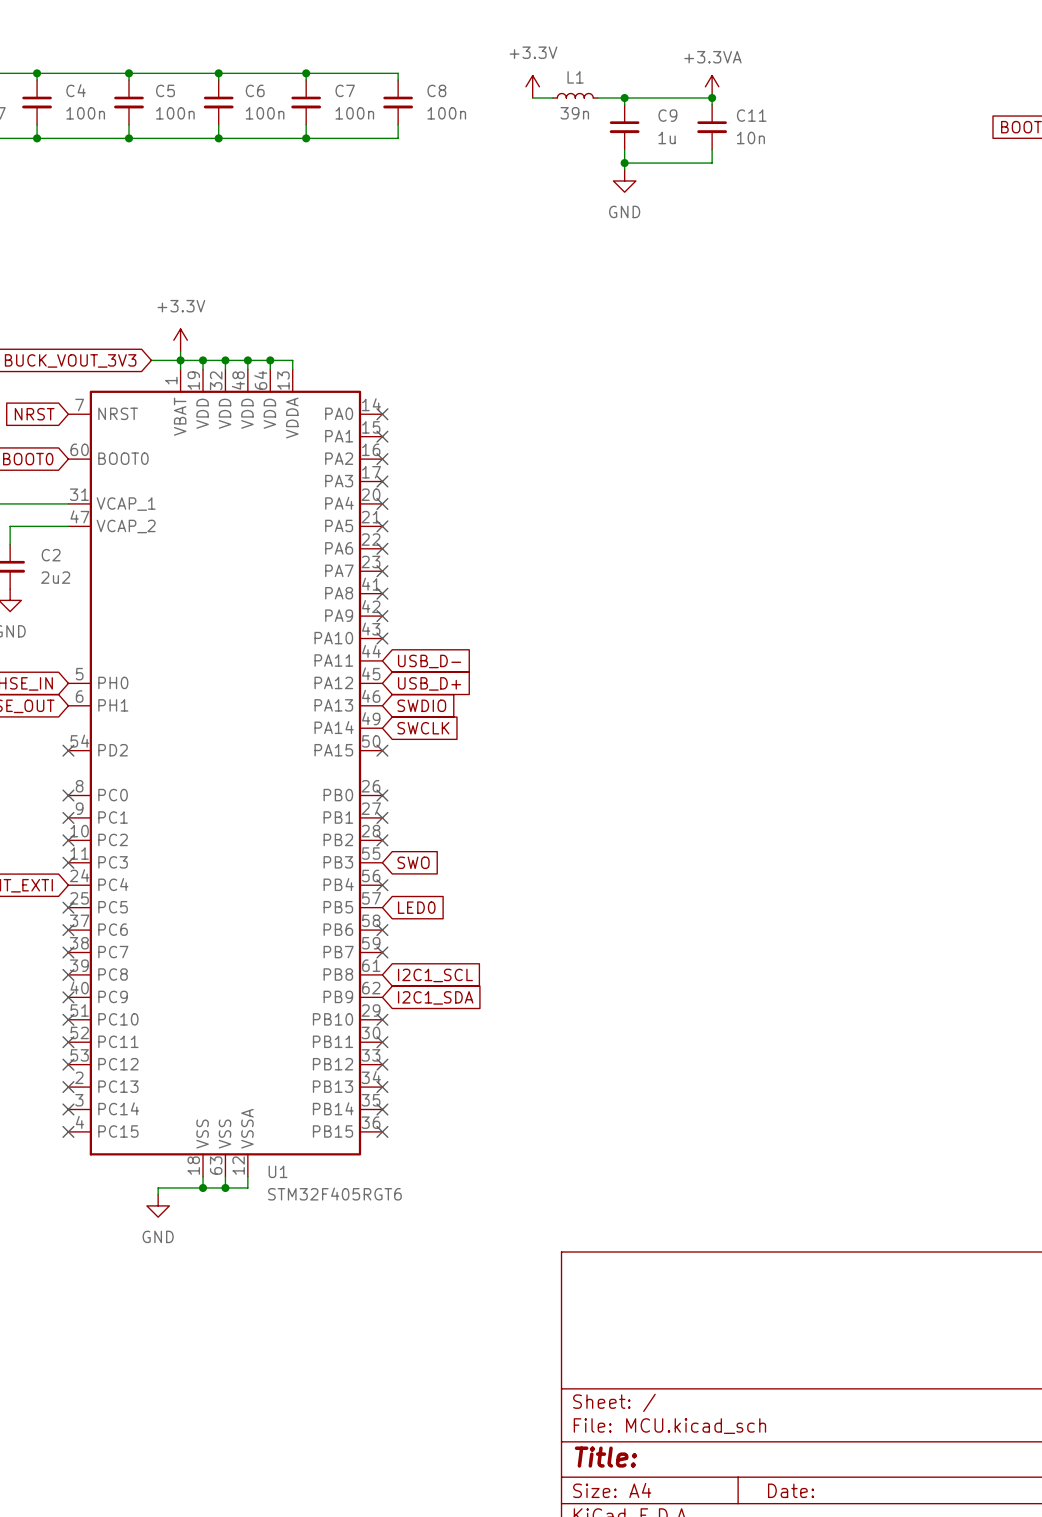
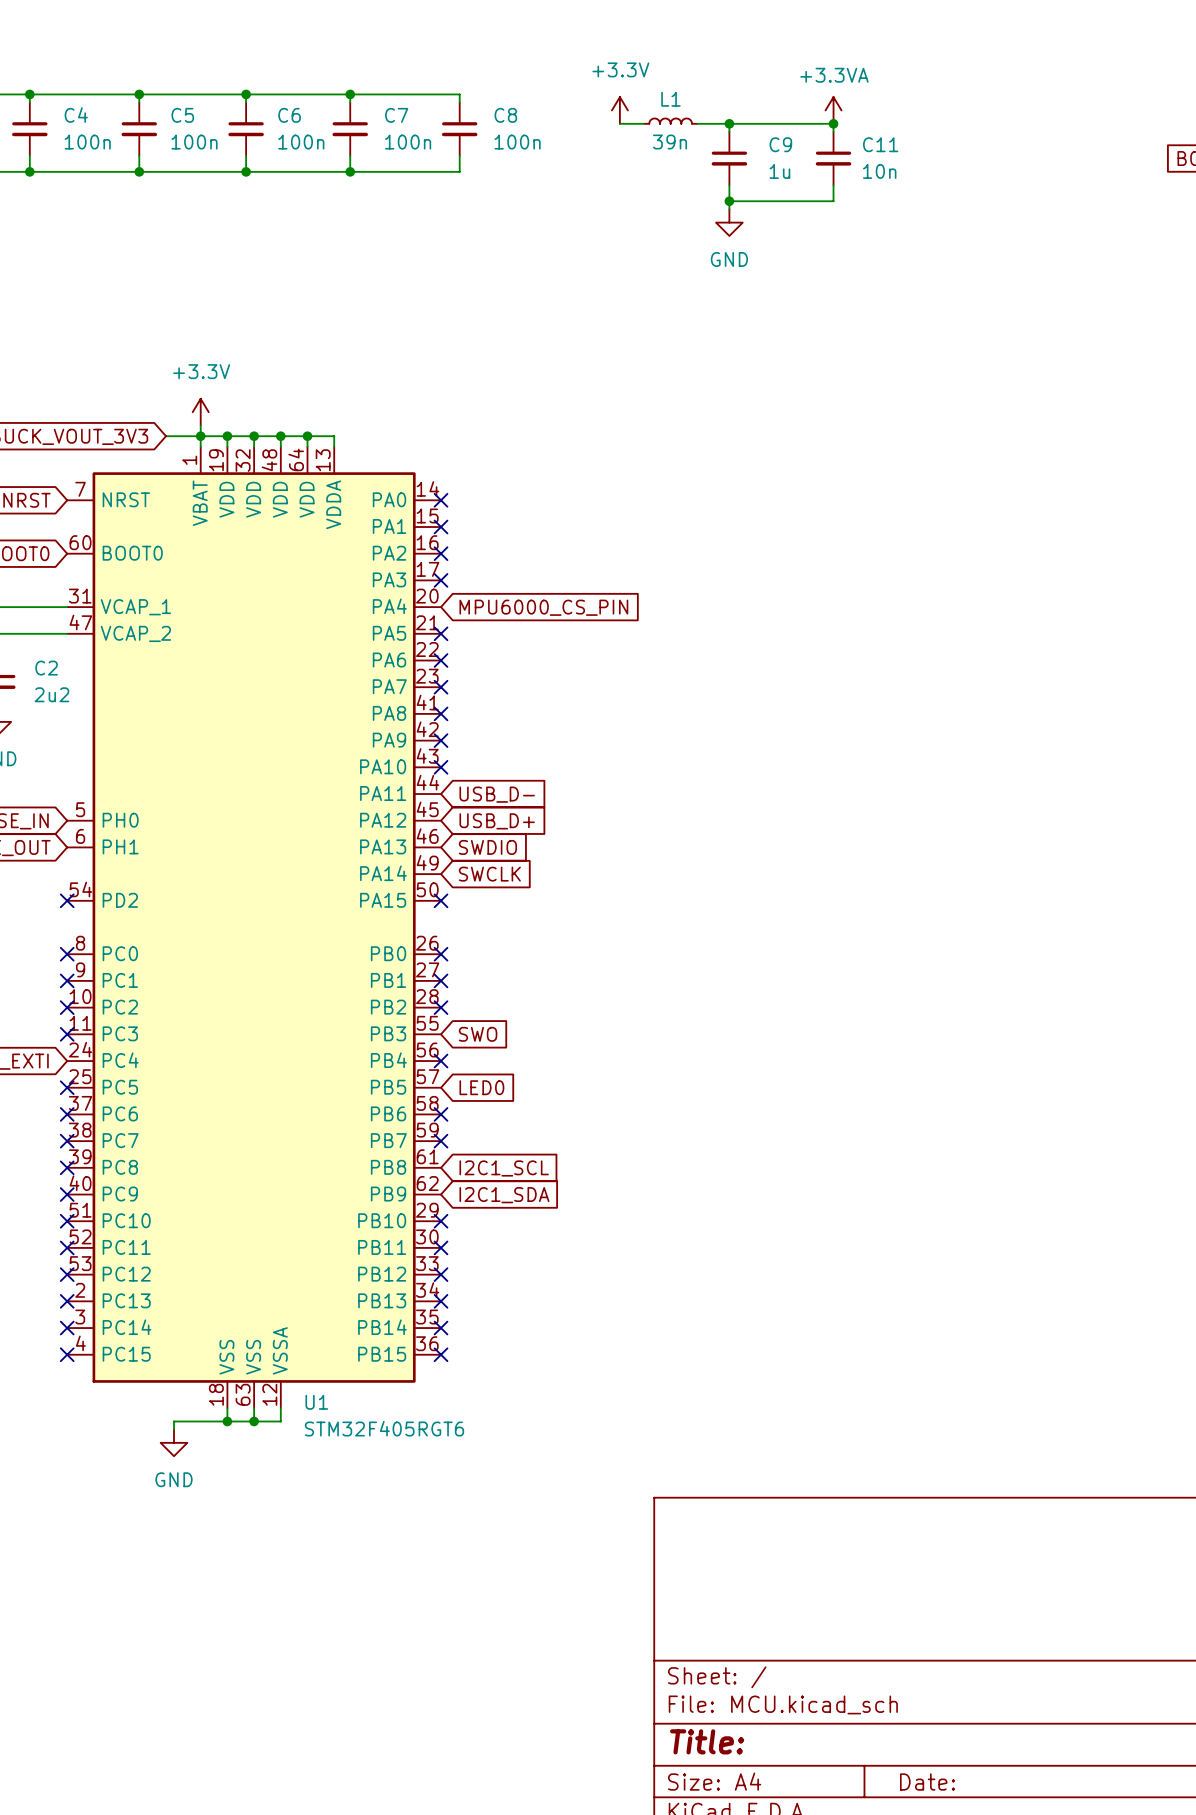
no-connect mark: (382, 503) -> none
global label: none -> MPU6000_CS_PIN (543, 607)

